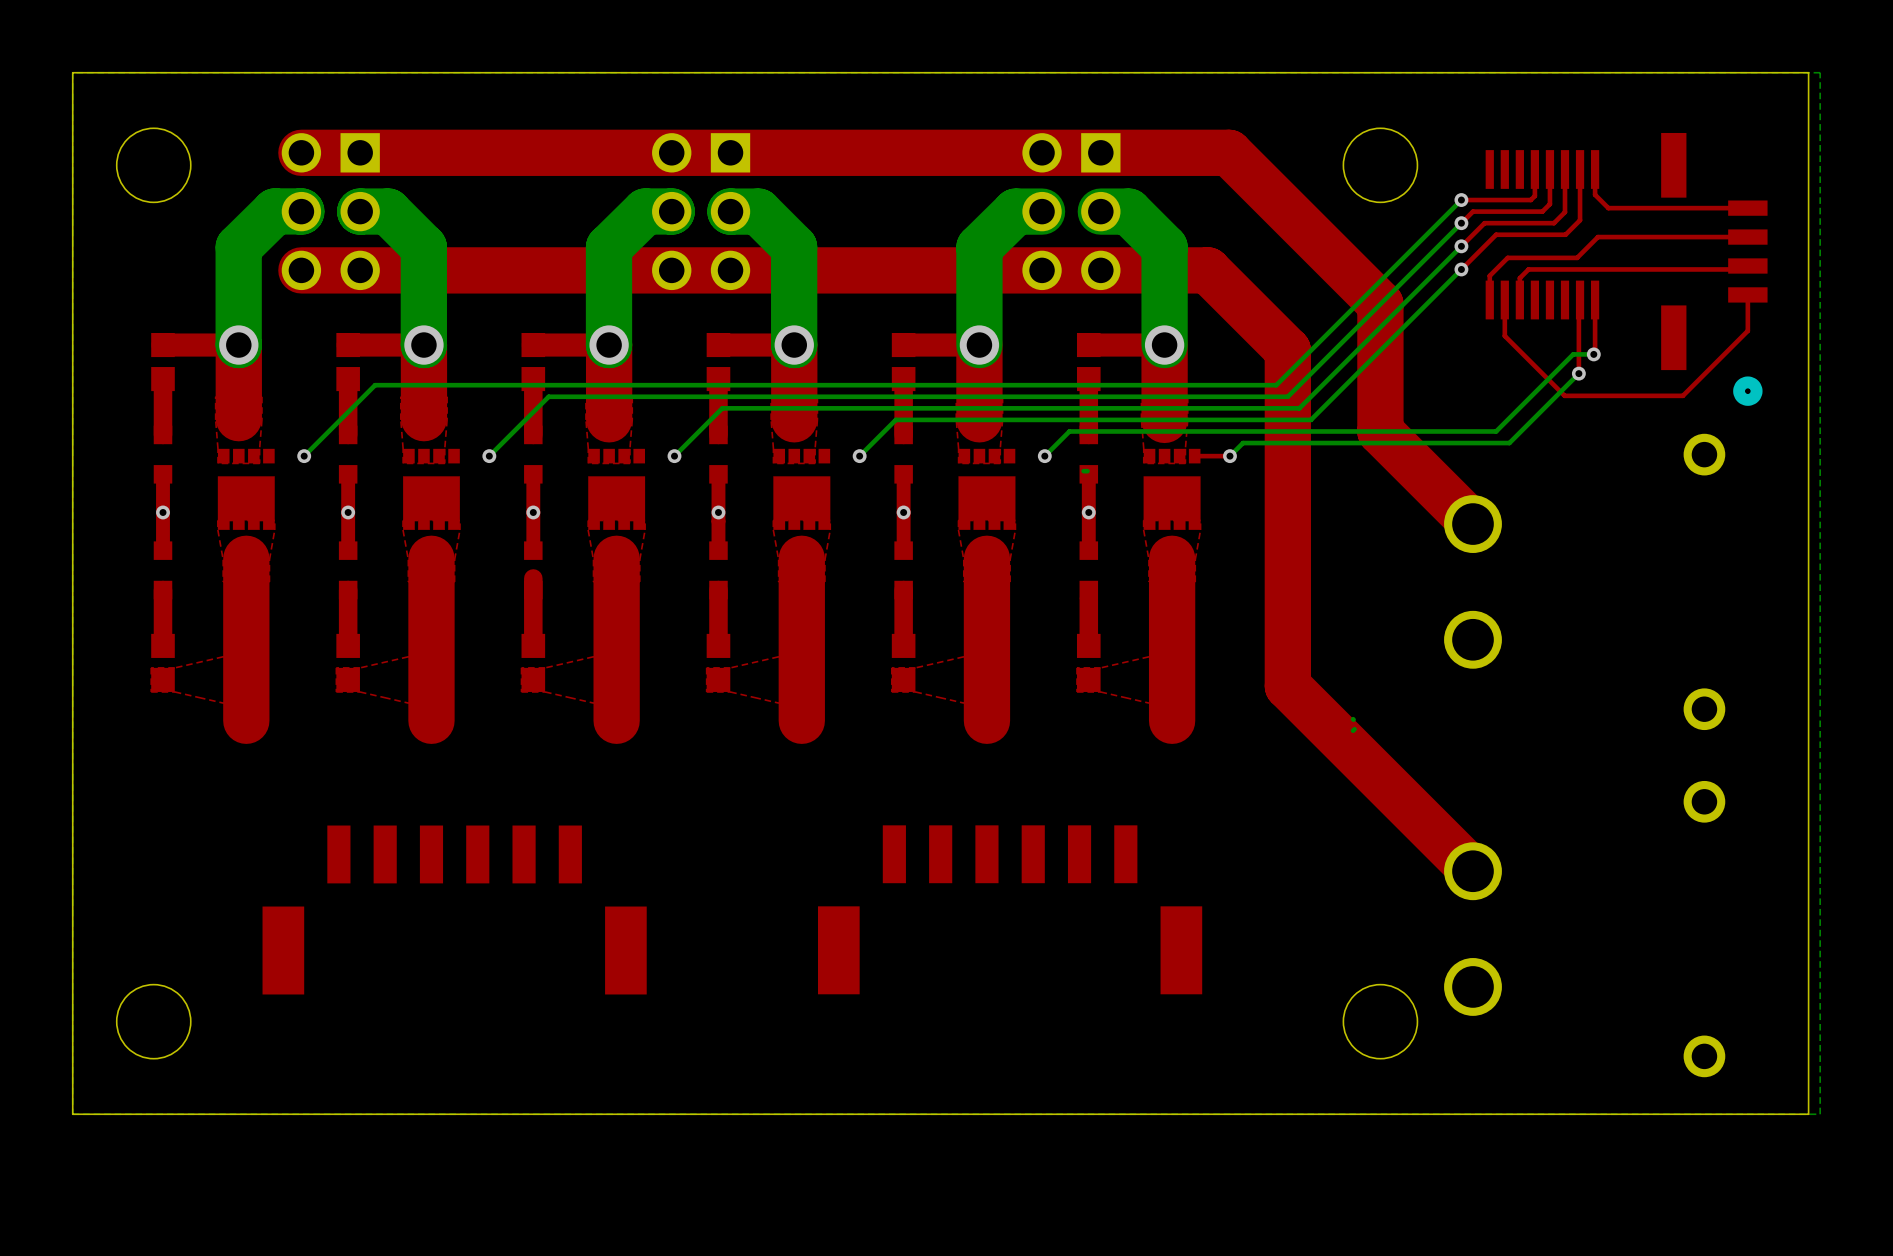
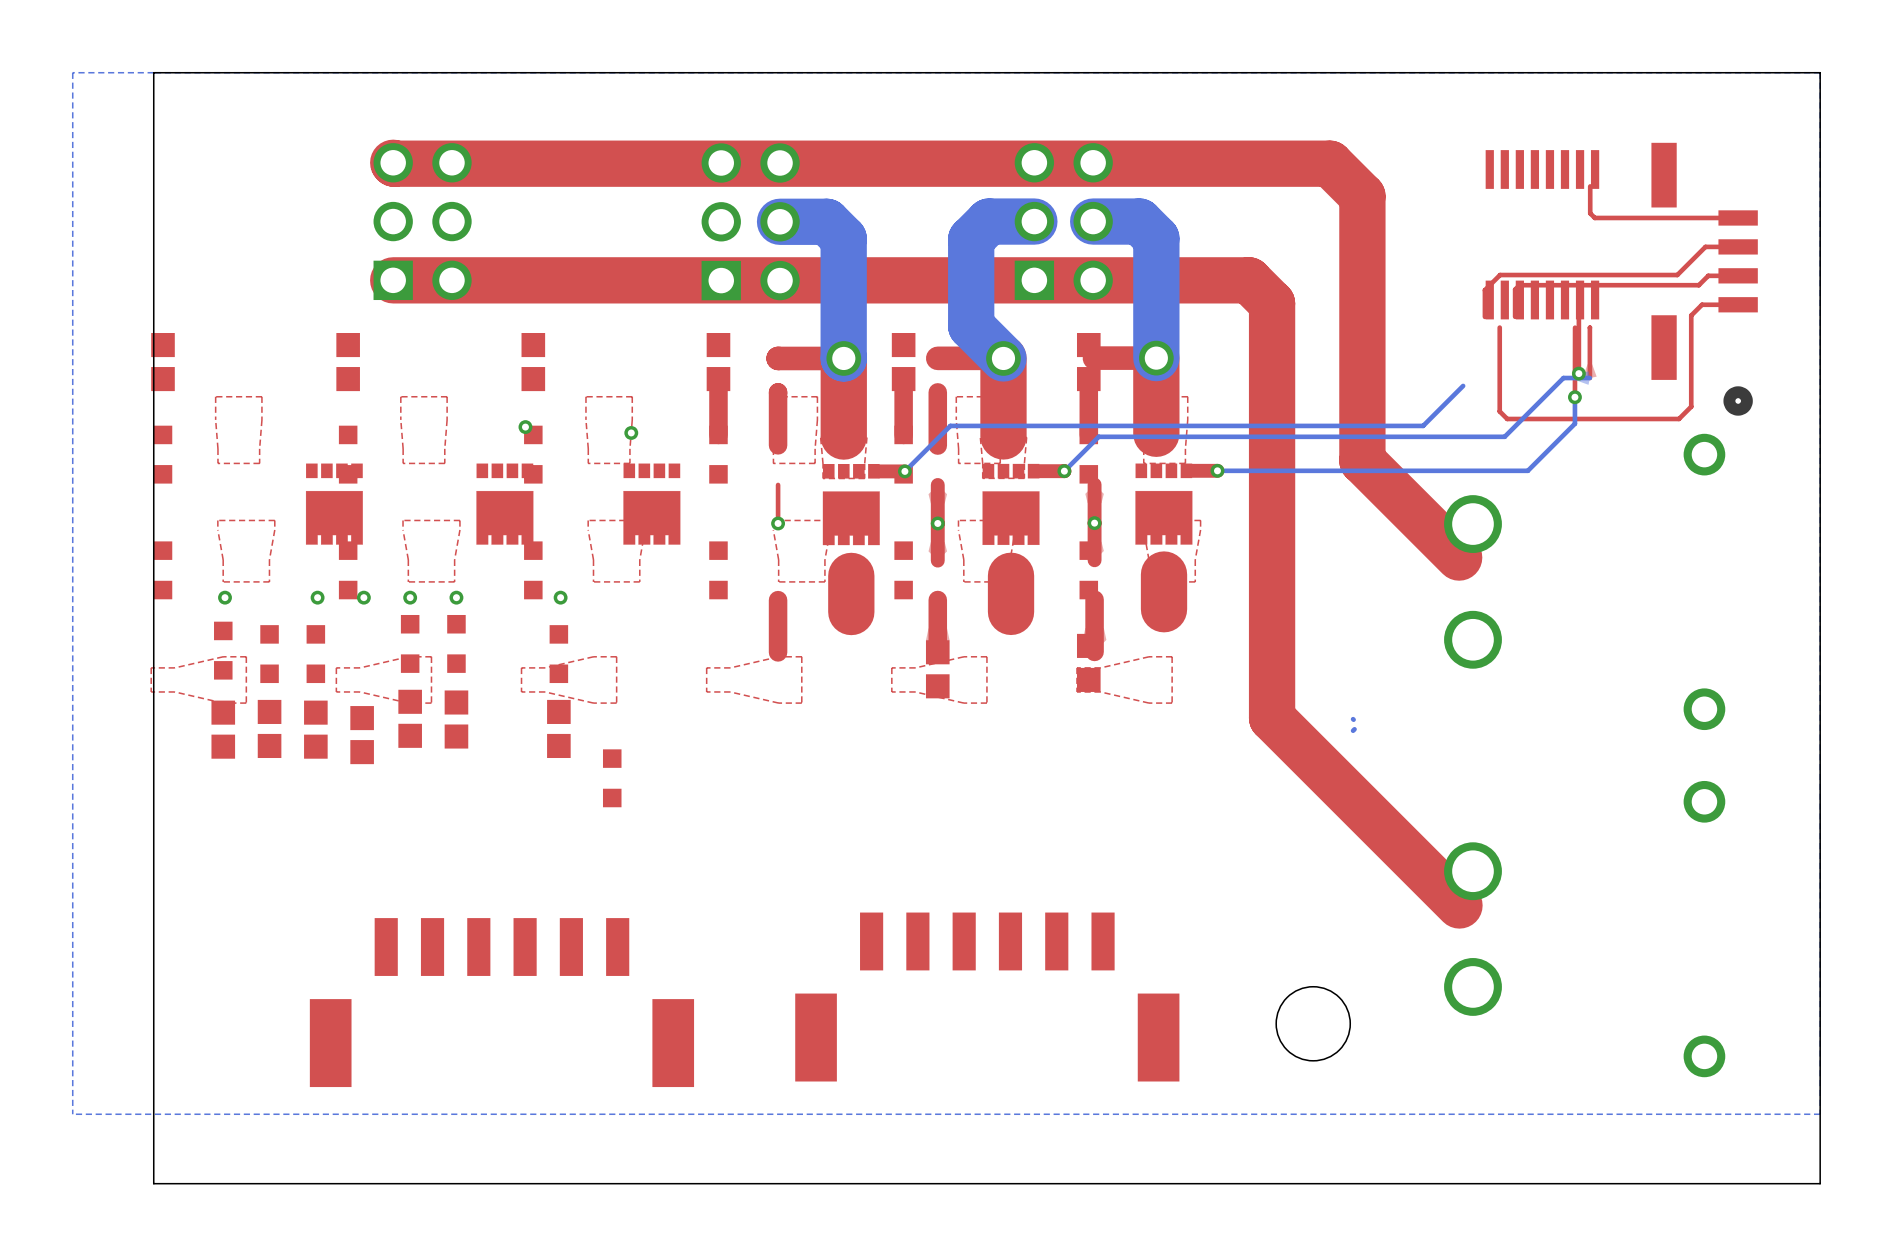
board edge: (1808, 72) (1808, 1114) (72, 1114) (72, 72) (153, 72) -> (1808, 72) (1820, 72) (1820, 1183) (153, 1183) (153, 72)
round board edge: [116, 127, 192, 203] -> none
round board edge: [1342, 127, 1419, 203] -> none
top track: (301, 152) (1229, 152) (1380, 304) (1380, 431) (1472, 524) -> none
top track: none -> (393, 162) (1329, 163) (1362, 196) (1362, 460) (1459, 557)
top track: (1534, 169) (1534, 195) (1530, 200) (1461, 200) -> none
top track: (1549, 169) (1549, 204) (1542, 211) (1472, 211) (1461, 223) -> none
top track: (1564, 169) (1564, 212) (1554, 223) (1484, 223) (1461, 246) -> none
top track: (1580, 169) (1580, 220) (1565, 234) (1496, 234) (1461, 269) -> none
top track: (1595, 169) (1595, 194) (1608, 208) (1747, 208) -> none
top track: none -> (1590, 186) (1590, 213) (1594, 217) (1738, 217)
bottom track: (1461, 200) (1276, 385) (375, 385) (304, 456) -> none
via: (1461, 200) -> none
bottom track: (301, 211) (275, 211) (238, 247) (238, 344) -> none
part rotation: 0° (330, 211) -> 180° (422, 221)
bottom track: (360, 211) (388, 211) (423, 247) (423, 344) -> none
bottom track: (671, 211) (645, 211) (609, 247) (609, 344) -> none
part rotation: 0° (701, 211) -> 180° (750, 221)
bottom track: (730, 211) (758, 211) (794, 247) (794, 344) -> none
bottom track: (1042, 211) (1015, 211) (979, 247) (979, 345) -> none
part rotation: 0° (1071, 211) -> 180° (1063, 221)
bottom track: (1100, 211) (1128, 211) (1164, 247) (1164, 345) -> none
bottom track: none -> (780, 221) (826, 221) (843, 238) (843, 358)
bottom track: none -> (1034, 221) (989, 221) (971, 239) (971, 326) (1003, 358)
bottom track: none -> (1093, 221) (1139, 221) (1156, 238) (1156, 358)
bottom track: (1461, 223) (1287, 396) (548, 396) (489, 456) -> none
via: (1461, 223) -> none
top track: (1747, 237) (1597, 237) (1577, 257) (1507, 257) (1489, 275) (1488, 299) -> none
bottom track: (1461, 246) (1299, 408) (722, 408) (674, 456) -> none
via: (1461, 246) -> none
top track: none -> (1738, 246) (1705, 246) (1677, 275) (1500, 275) (1484, 290) (1484, 316)
top track: (1747, 265) (1744, 269) (1528, 269) (1519, 278) (1519, 300) -> none
bottom track: (1461, 269) (1310, 419) (895, 419) (859, 456) -> none
via: (1461, 269) -> none
part position: (1714, 269) -> (1704, 279)
top track: (301, 270) (1207, 270) (1287, 350) (1287, 686) (1472, 871) -> none
top track: none -> (1738, 275) (1708, 275) (1698, 285) (1519, 285) (1515, 289) (1515, 316)
top track: none -> (1248, 280) (393, 280)
top track: none -> (1248, 280) (1272, 303) (1272, 718) (1459, 905)
top track: (1747, 294) (1747, 330) (1682, 395) (1564, 395) (1504, 336) (1503, 304) -> none
top track: (1593, 304) (1593, 354) -> none
top track: none -> (1738, 304) (1702, 304) (1691, 315) (1691, 406) (1678, 418) (1507, 418) (1499, 411) (1499, 327)
top track: none -> (1575, 327) (1574, 397)
top track: none -> (1589, 327) (1589, 378)
top track: (979, 344) (904, 345) -> none
top track: (163, 345) (238, 345) (238, 418) -> none
via: (238, 345) -> none
top track: (348, 345) (423, 345) (423, 418) -> none
via: (423, 345) -> none
top track: (533, 345) (609, 345) (609, 419) -> none
via: (609, 345) -> none
top track: (718, 345) (794, 345) (794, 419) -> none
via: (794, 345) -> none
top track: (979, 345) (979, 419) -> none
via: (979, 345) -> none
top track: (1088, 345) (1164, 345) (1164, 419) -> none
via position: (1164, 345) -> (1156, 358)
bottom track: (1593, 354) (1573, 354) (1496, 431) (1069, 431) (1044, 456) -> none
via position: (1593, 354) -> (1574, 397)
top track: none -> (778, 358) (843, 358) (843, 436)
via: none -> (843, 358)
top track: none -> (937, 358) (1003, 358) (1003, 436)
via: none -> (1003, 358)
top track: none -> (1094, 358) (1156, 358) (1156, 433)
bottom track: (1578, 373) (1509, 443) (1243, 443) (1229, 456) -> none
bottom track: none -> (1589, 378) (1563, 378) (1504, 436) (1098, 436) (1064, 471)
top track: (163, 379) (163, 434) -> none
top track: (348, 379) (348, 434) -> none
top track: (533, 379) (533, 434) -> none
bottom track: none -> (1463, 385) (1423, 425) (950, 425) (904, 471)
top track: none -> (778, 392) (778, 445)
top track: none -> (937, 392) (937, 445)
bottom track: none -> (1574, 397) (1574, 423) (1527, 470) (1217, 470)
via: none -> (525, 427)
top zone outline: none -> (866, 437) (820, 437) (823, 478) (864, 478) (866, 437)
top zone outline: none -> (1026, 437) (1024, 478) (982, 478) (980, 437) (1026, 437)
via: (304, 456) -> none
via: (489, 456) -> none
via position: (674, 456) -> (631, 432)
via: (859, 456) -> none
via: (1044, 456) -> none
top track: (1227, 456) (1194, 456) -> none
via position: (1229, 456) -> (1217, 470)
top track: none -> (1217, 470) (1192, 470)
top track: none -> (904, 471) (880, 471)
via: none -> (904, 471)
top track: none -> (1064, 471) (1039, 471)
via: none -> (1064, 471)
bottom track: (1087, 471) (1083, 471) -> none
top track: (163, 474) (163, 550) -> none
top track: (348, 474) (348, 550) -> none
top track: (533, 474) (533, 550) -> none
top track: (718, 474) (718, 550) -> none
top track: (903, 474) (903, 550) -> none
top track: (1088, 474) (1088, 550) -> none
top track: none -> (778, 484) (778, 523)
top track: none -> (937, 484) (937, 560)
top track: none -> (1094, 484) (1094, 560)
part: (246, 489) -> none
part: (431, 489) -> none
part position: (616, 489) -> (651, 504)
part position: (801, 489) -> (851, 504)
part position: (986, 489) -> (1011, 504)
part position: (1172, 489) -> (1163, 504)
part: none -> (334, 504)
part: none -> (504, 504)
via: (163, 512) -> none
via: (348, 512) -> none
via: (533, 512) -> none
via: (718, 512) -> none
via: (903, 512) -> none
via position: (1088, 512) -> (1094, 523)
via: none -> (778, 523)
via: none -> (937, 523)
top track: (246, 558) (246, 720) -> none
top track: (431, 558) (431, 720) -> none
top track: (616, 558) (616, 720) -> none
top track: (801, 558) (801, 720) -> none
top track: (986, 558) (986, 720) -> none
top track: (1172, 558) (1172, 720) -> none
top track: none -> (1164, 574) (1164, 609)
top track: none -> (851, 575) (851, 612)
top track: none -> (1011, 575) (1011, 611)
top track: (533, 578) (533, 645) -> none
top track: (163, 590) (163, 645) -> none
top track: (348, 590) (348, 645) -> none
top track: (718, 590) (718, 645) -> none
top track: (903, 590) (903, 645) -> none
via: none -> (225, 597)
via: none -> (317, 597)
via: none -> (363, 597)
via: none -> (410, 597)
via: none -> (456, 597)
via: none -> (560, 597)
top track: (1088, 599) (1088, 645) -> none
top track: none -> (1094, 599) (1094, 651)
top track: none -> (778, 600) (778, 652)
top track: none -> (937, 600) (937, 652)
part: none -> (410, 643)
part: none -> (456, 643)
part: none -> (223, 650)
part: none -> (269, 654)
part: none -> (315, 654)
part: none -> (558, 654)
part: (163, 662) -> none
part: (348, 662) -> none
part: (533, 662) -> none
part: (718, 662) -> none
part position: (903, 662) -> (937, 669)
part: none -> (410, 718)
part: none -> (456, 719)
part: none -> (269, 728)
part: none -> (558, 728)
part: none -> (223, 729)
part: none -> (315, 729)
part: none -> (362, 735)
part: none -> (612, 778)
part position: (1010, 909) -> (987, 997)
part position: (454, 910) -> (501, 1002)
round board edge: [116, 984, 192, 1060] -> none
round board edge position: (1380, 1021) -> (1313, 1023)

